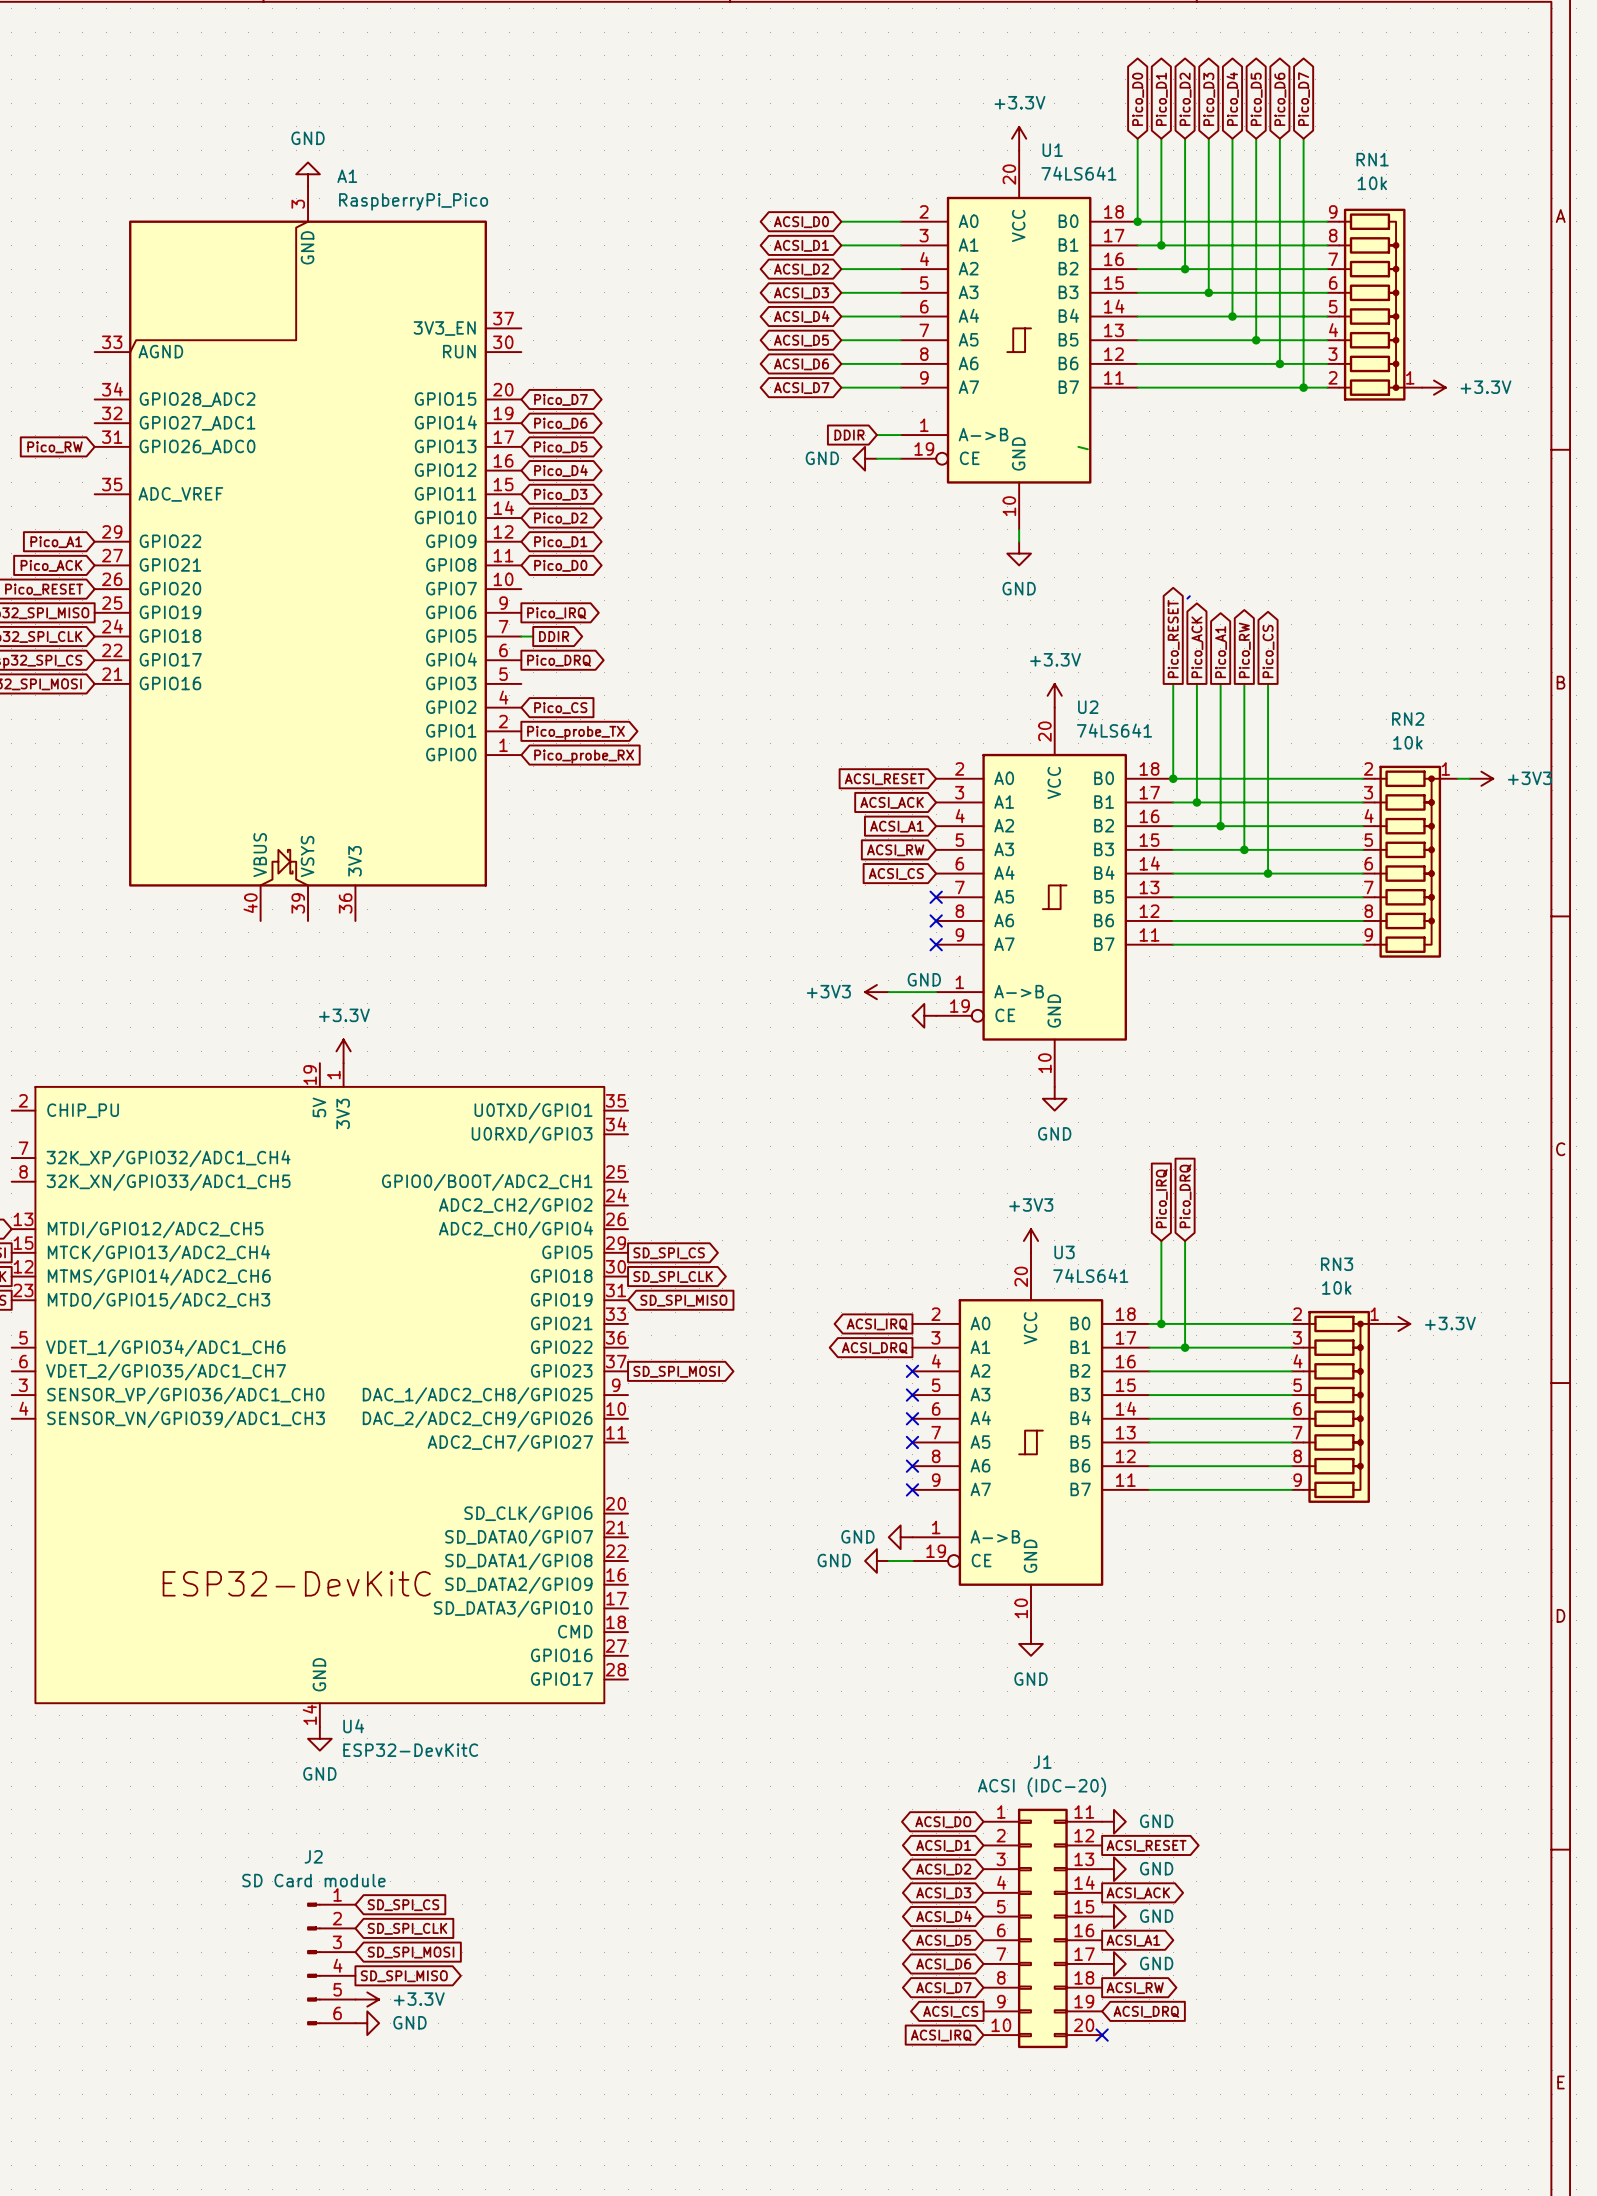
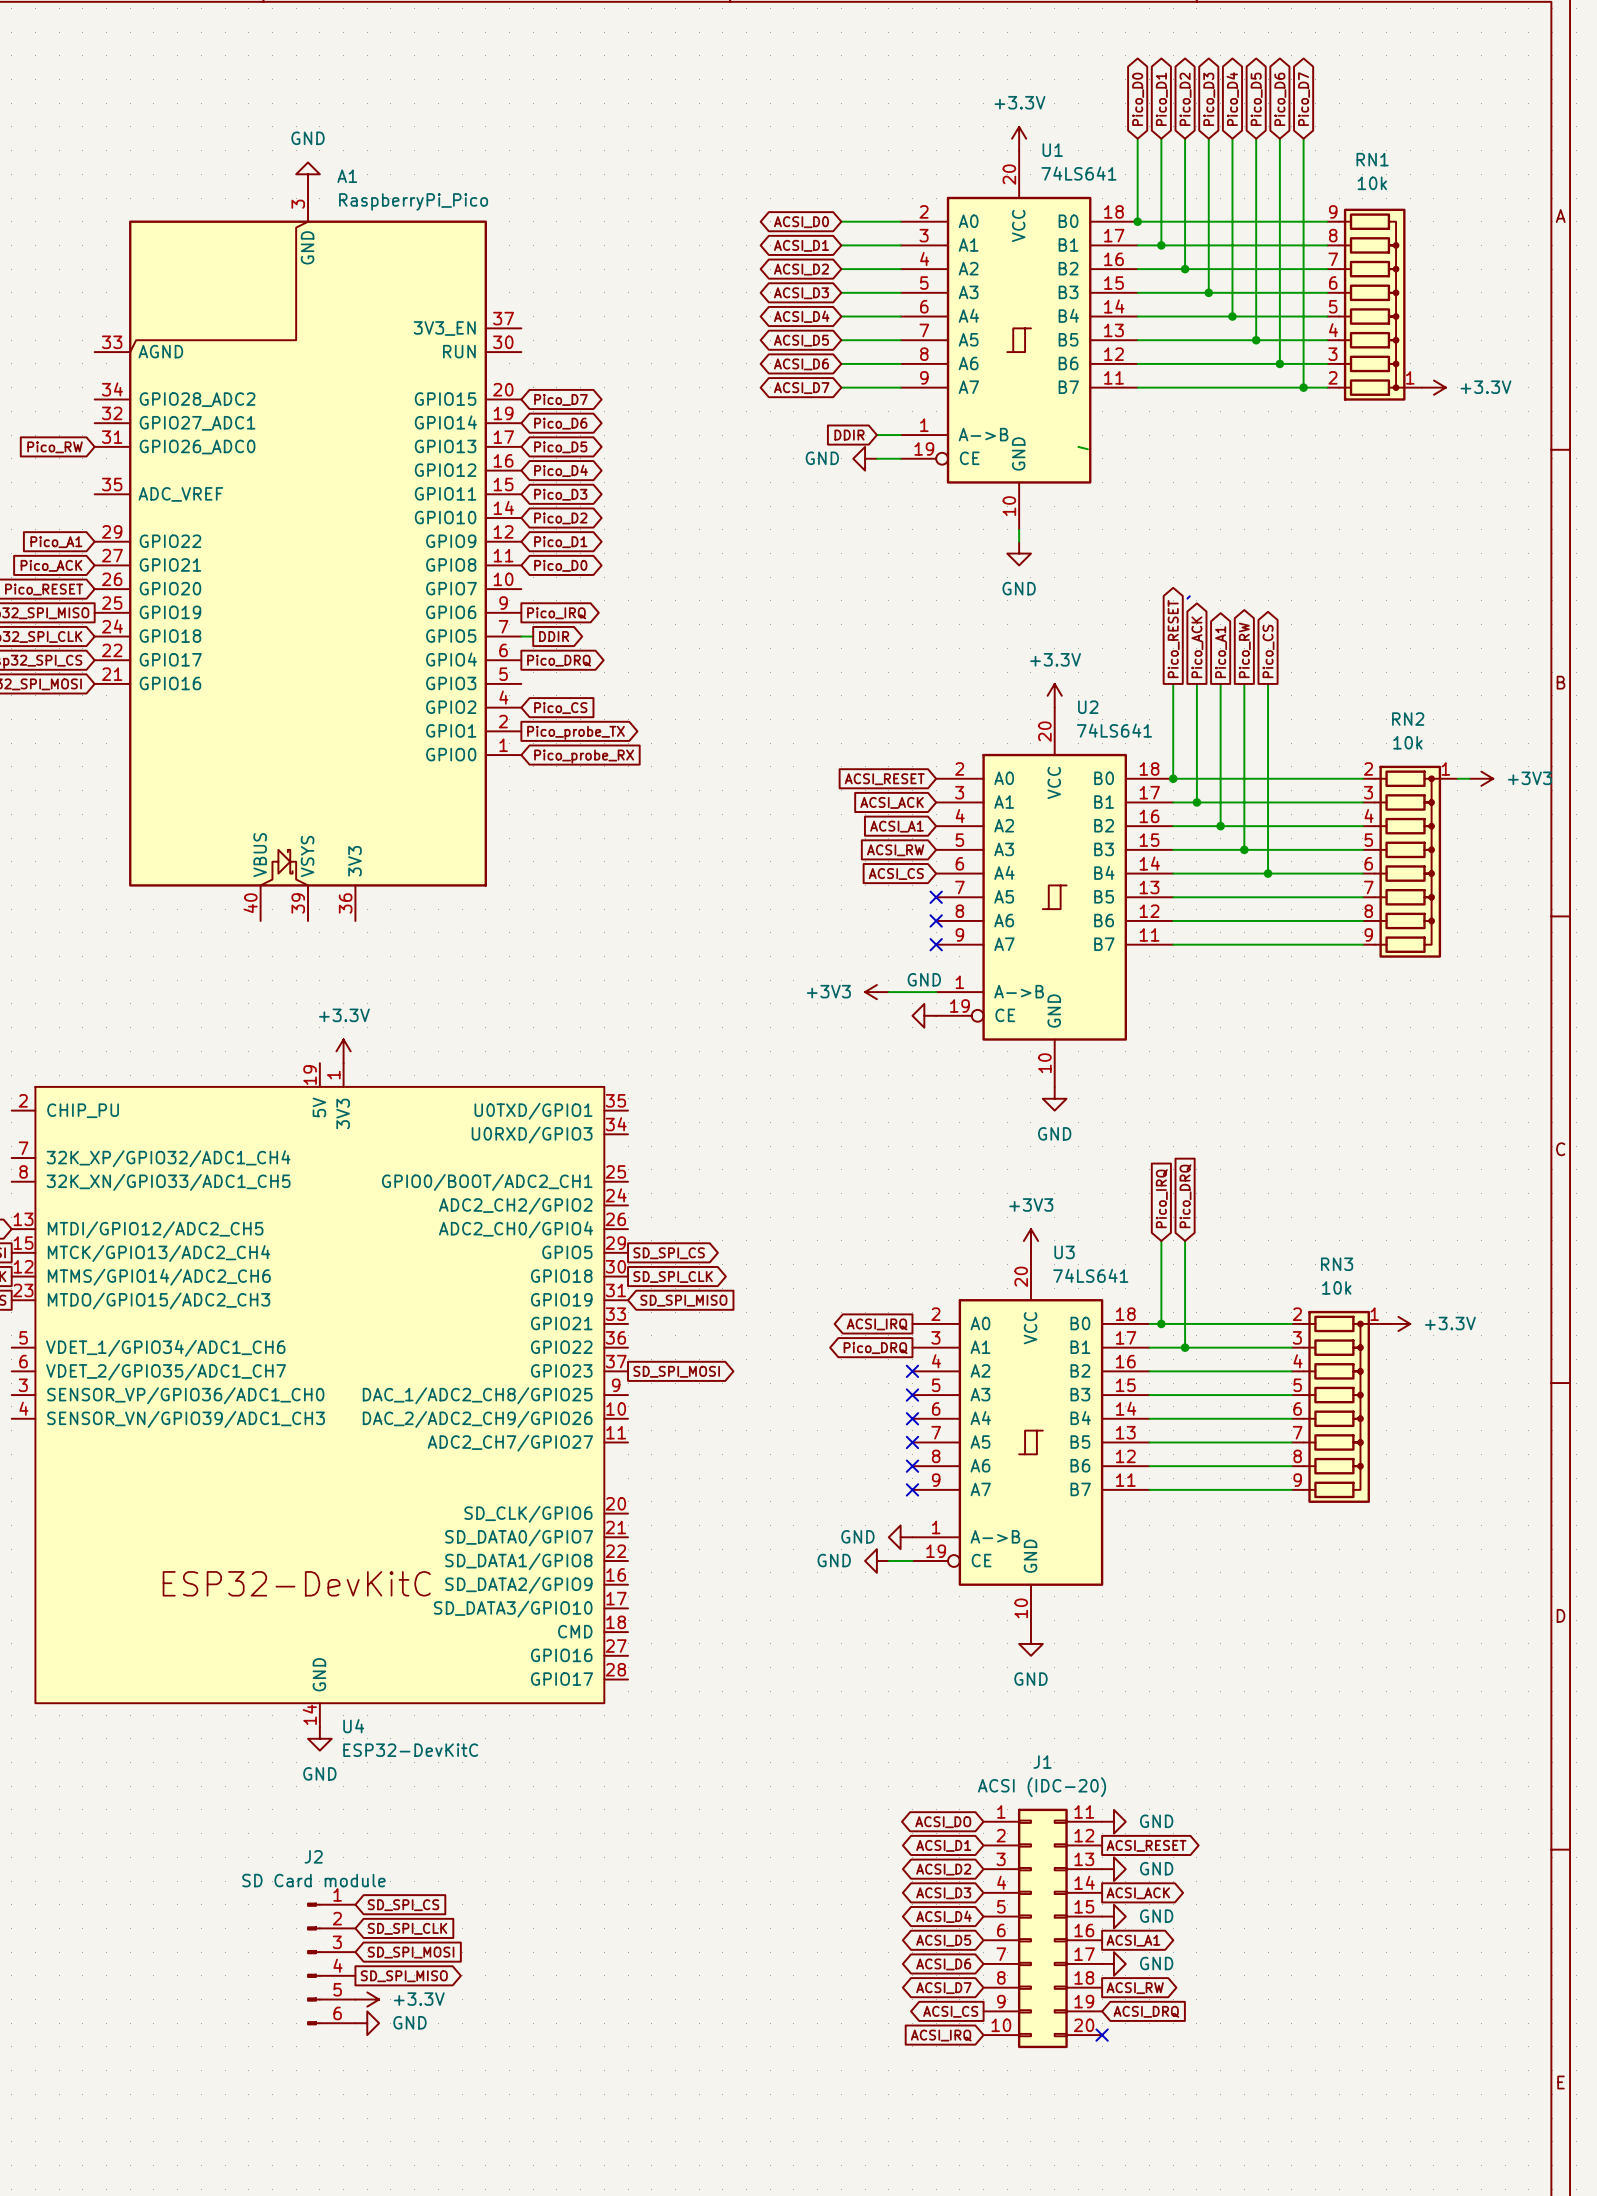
global label: ACSI_DRQ (874, 1348) -> Pico_DRQ (875, 1348)

